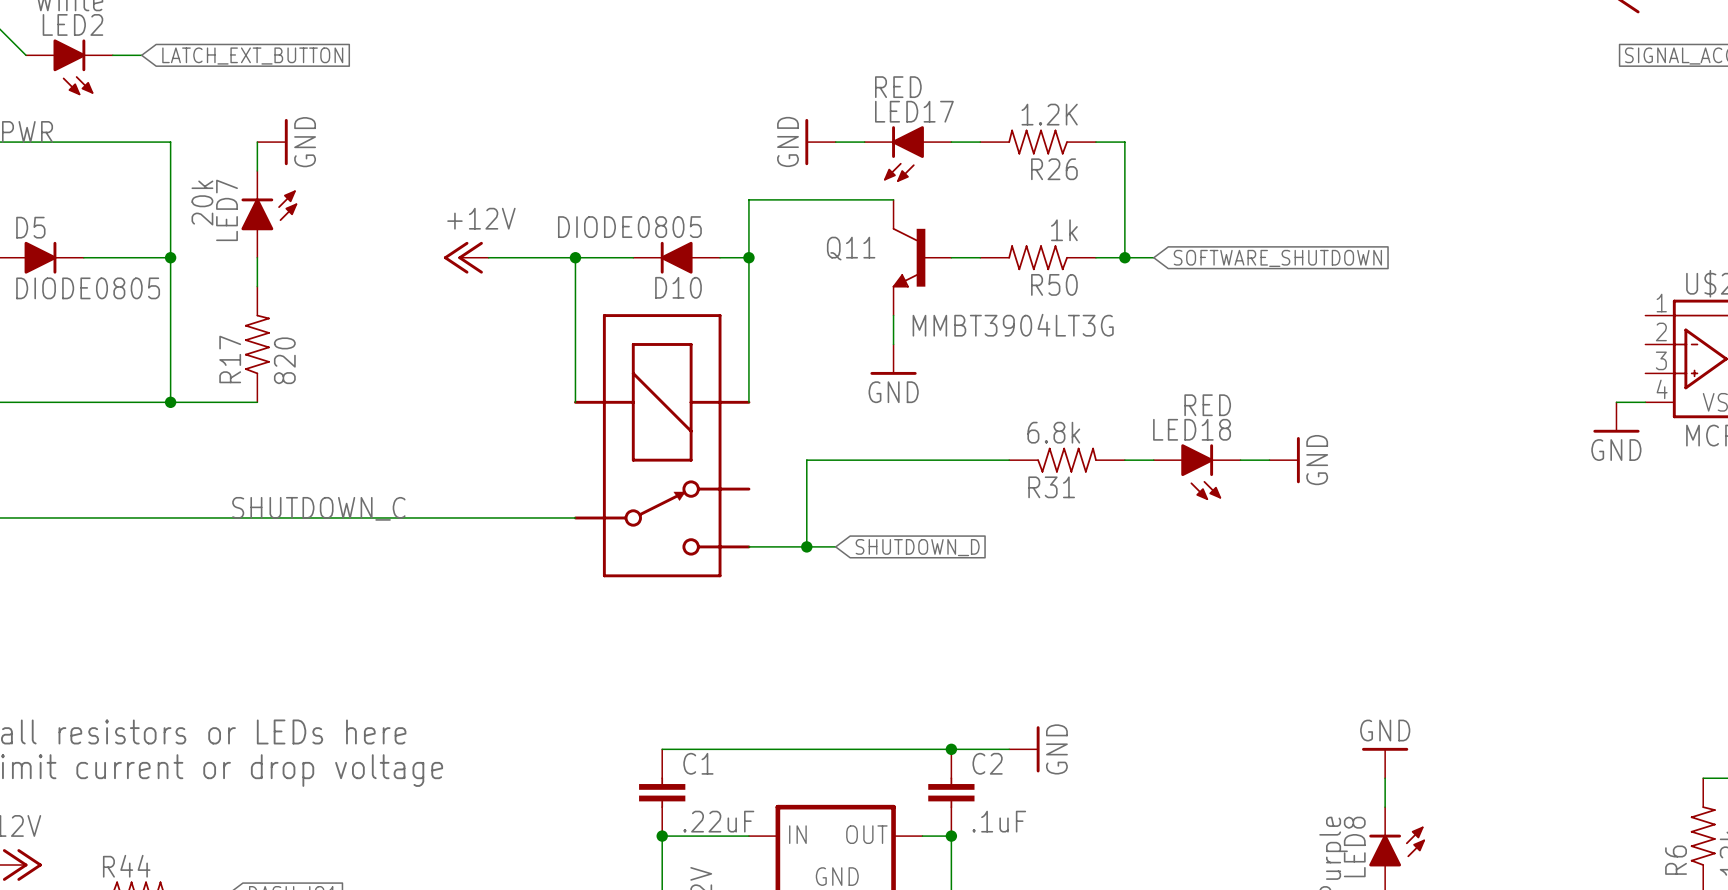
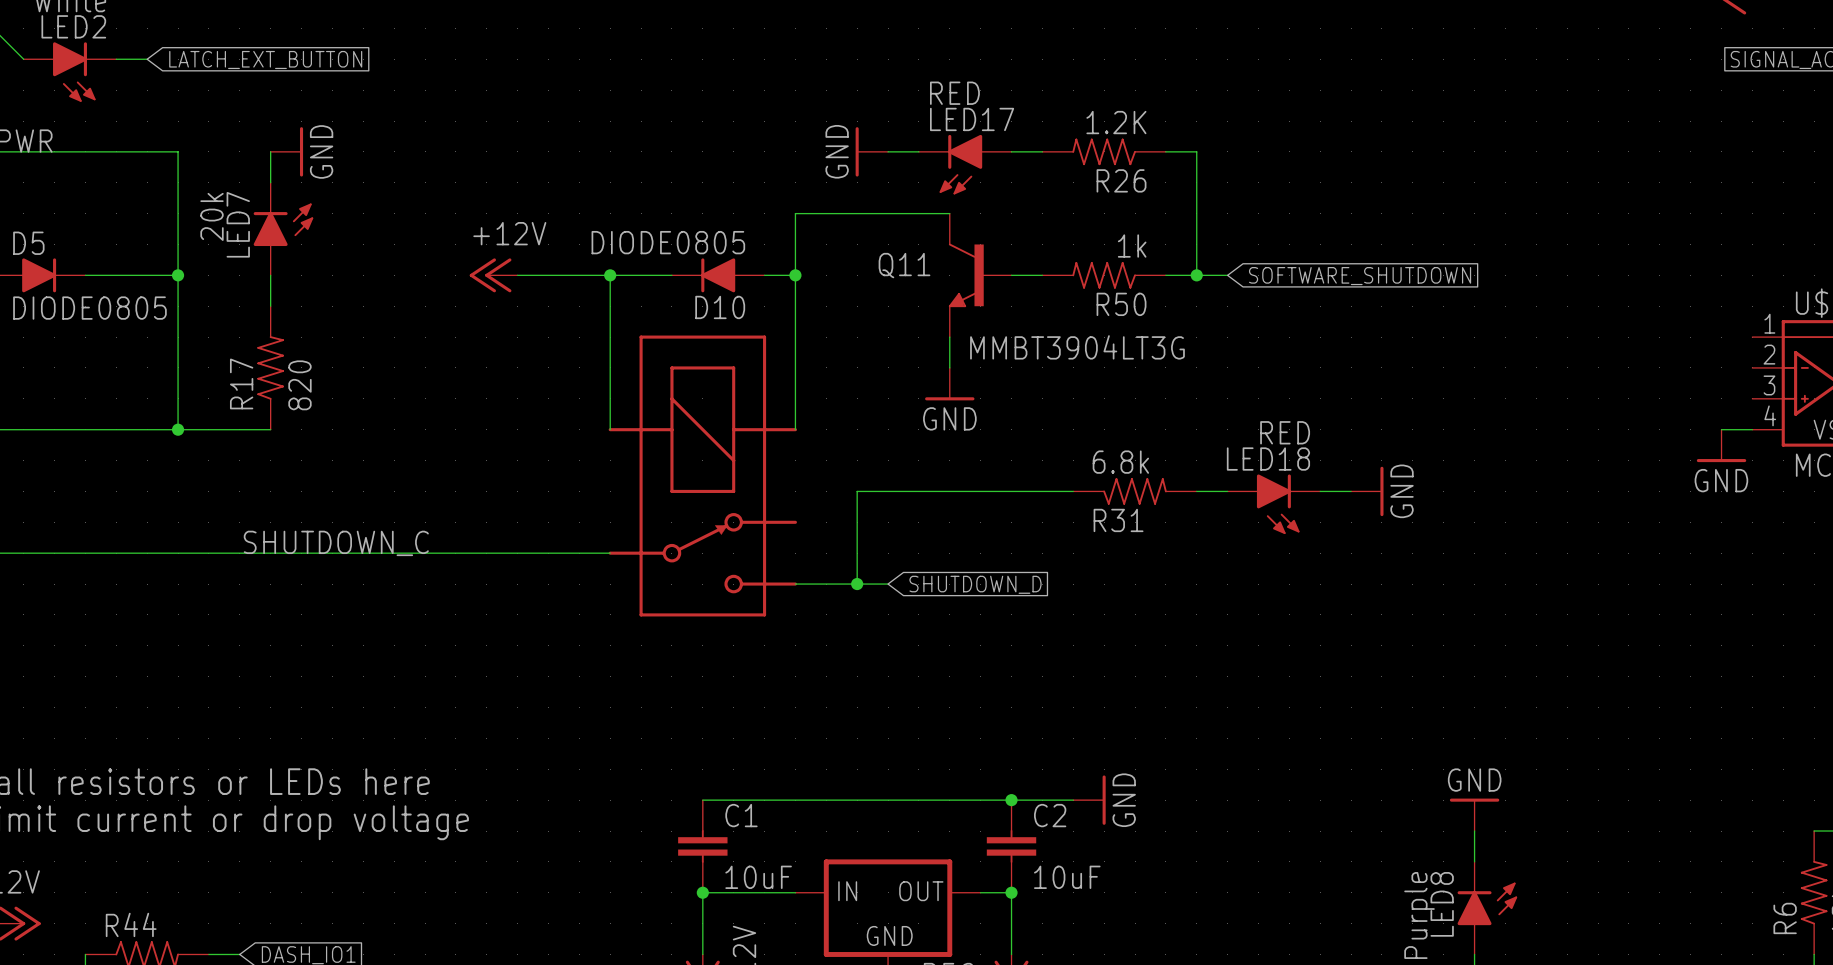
C1 value: .22uF (718, 821) -> 10uF (758, 877)
C2 value: .1uF (999, 821) -> 10uF (1067, 877)

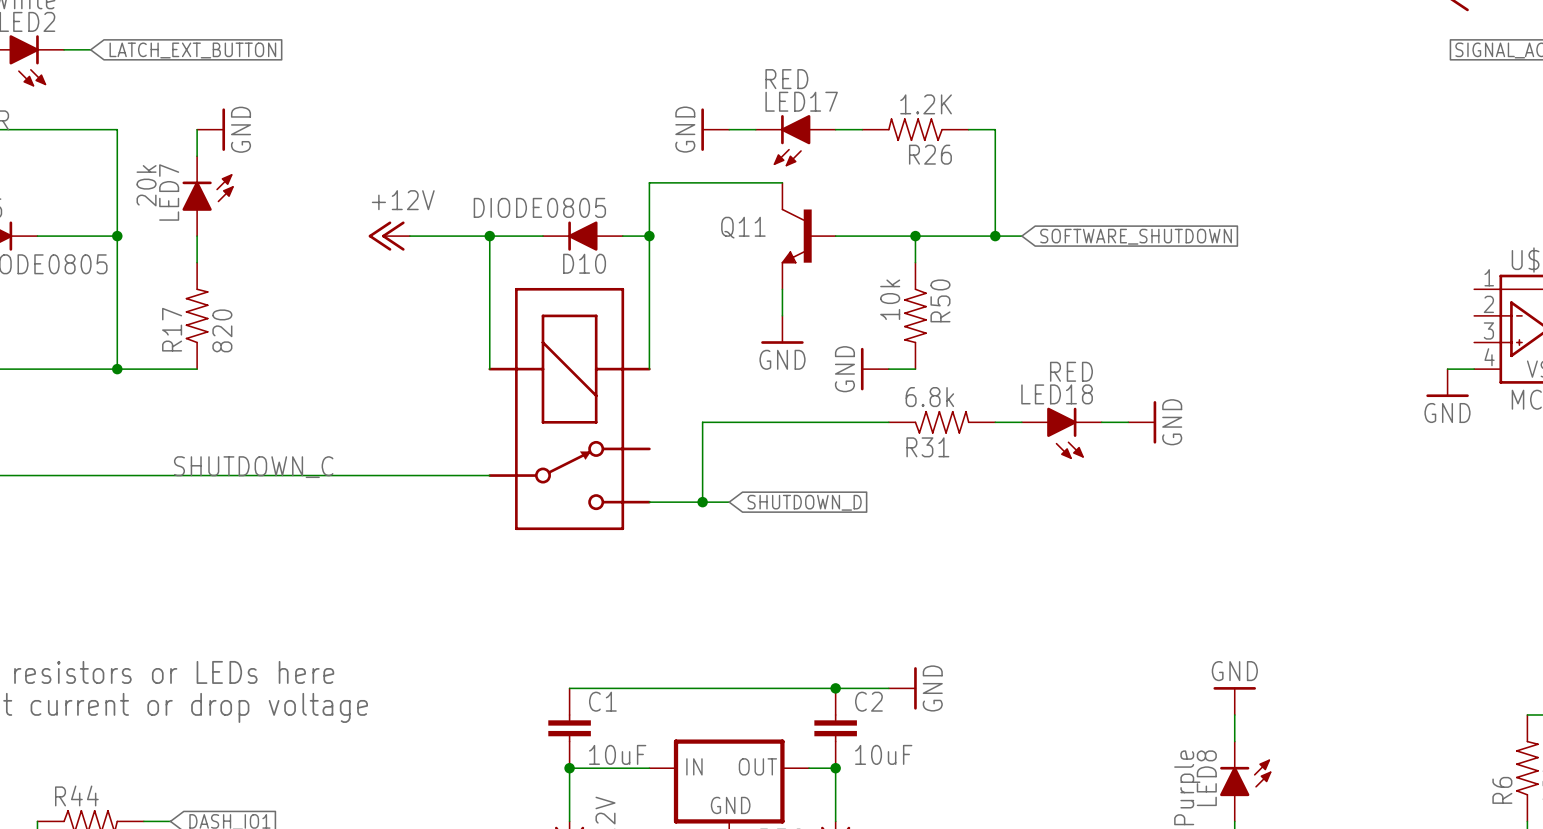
R50 value: 1k (1132, 246) -> 10k (890, 299)
wire: none -> (915, 236) (915, 262)
R50 rotation: 0° (1104, 275) -> 90° counterclockwise (915, 315)
R50 position: (1104, 275) -> (915, 315)
junction: none -> (915, 236)
Q11 value: MMBT3904LT3G (1077, 347) -> none
power symbol: none -> GND (874, 369)
wire: none -> (888, 369) (915, 369)

